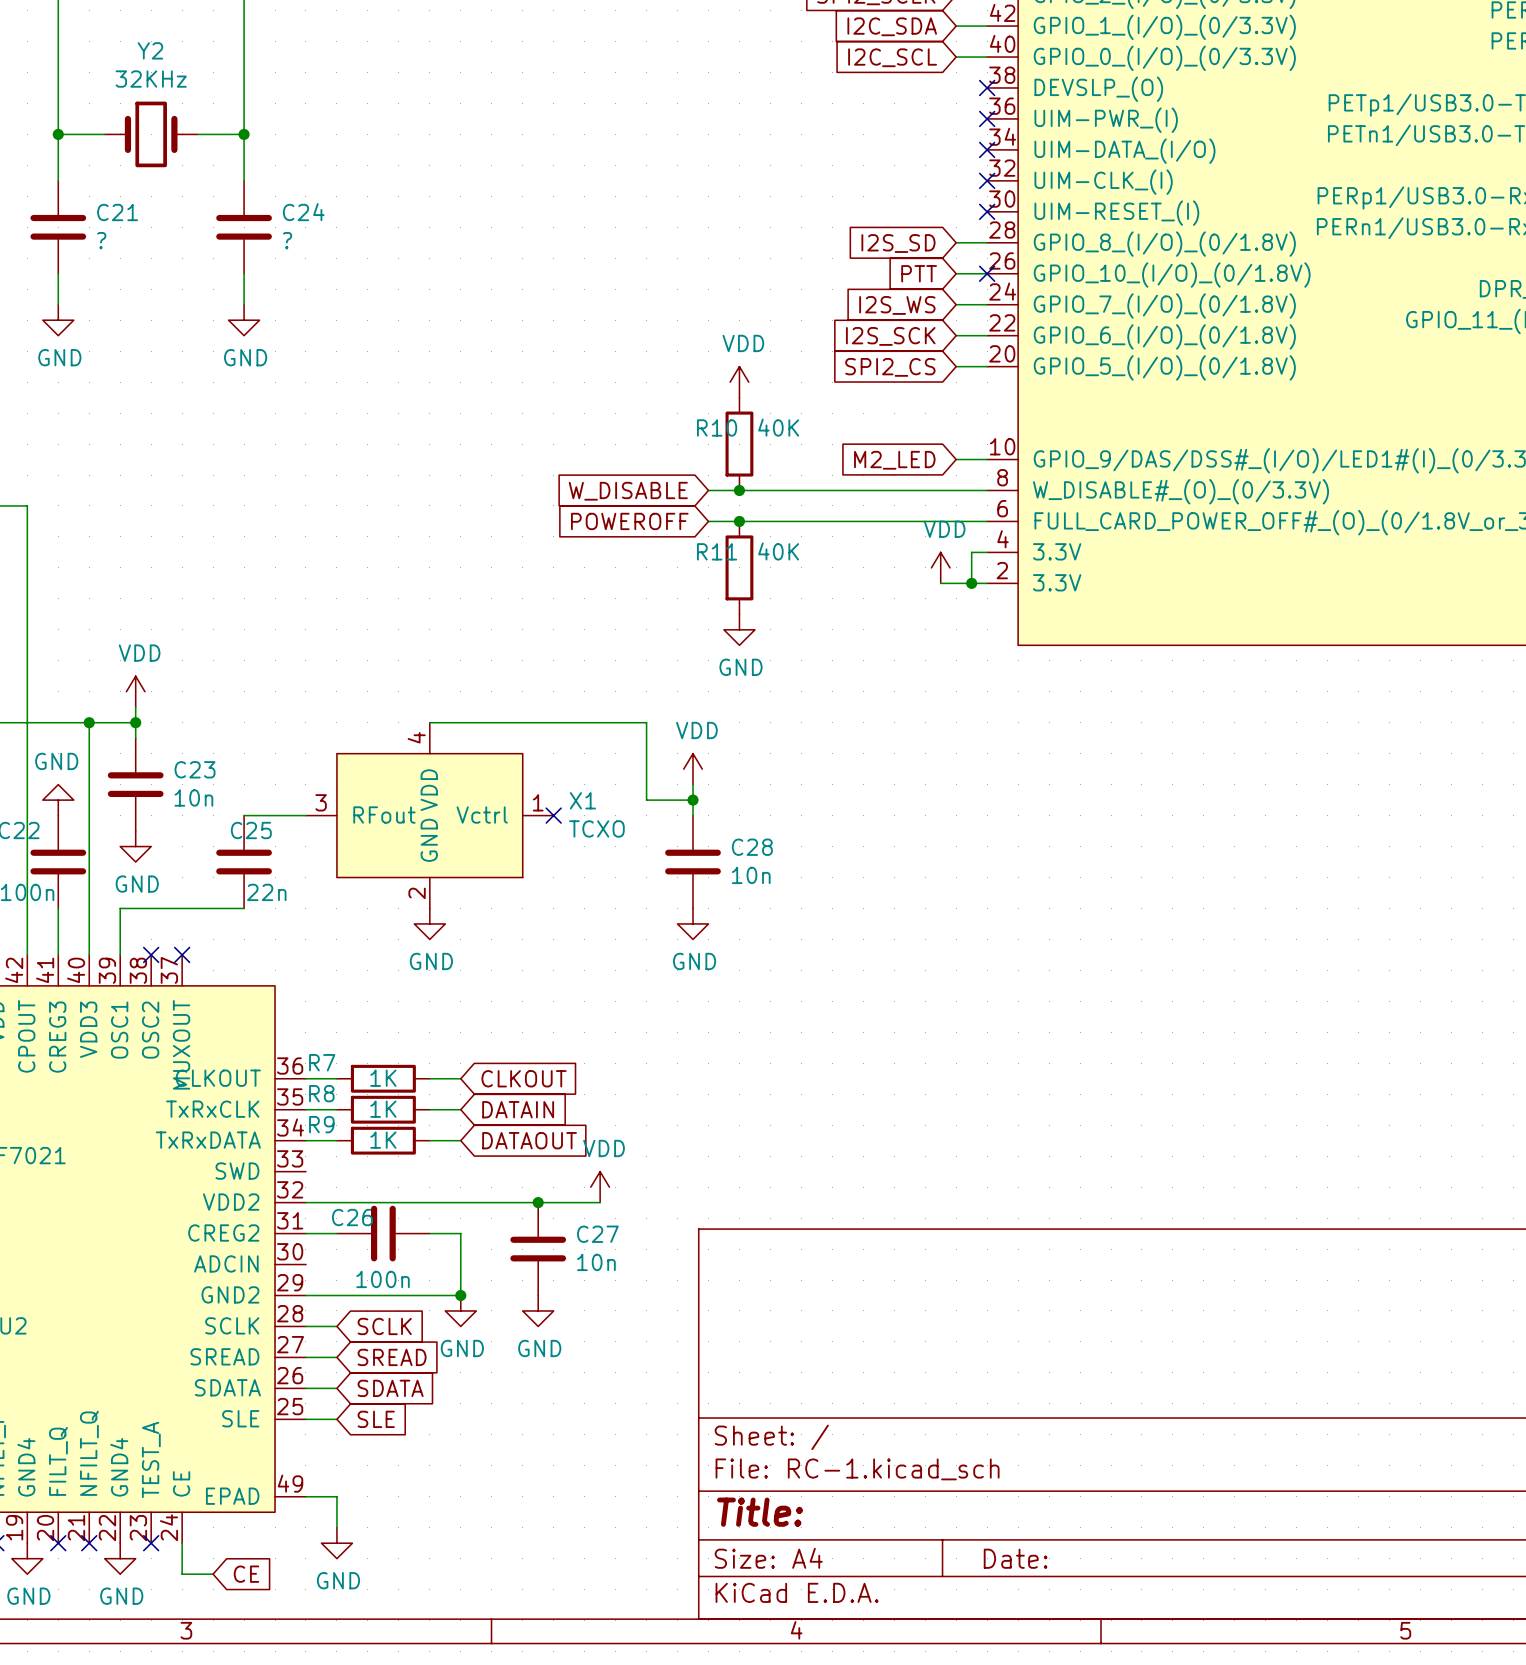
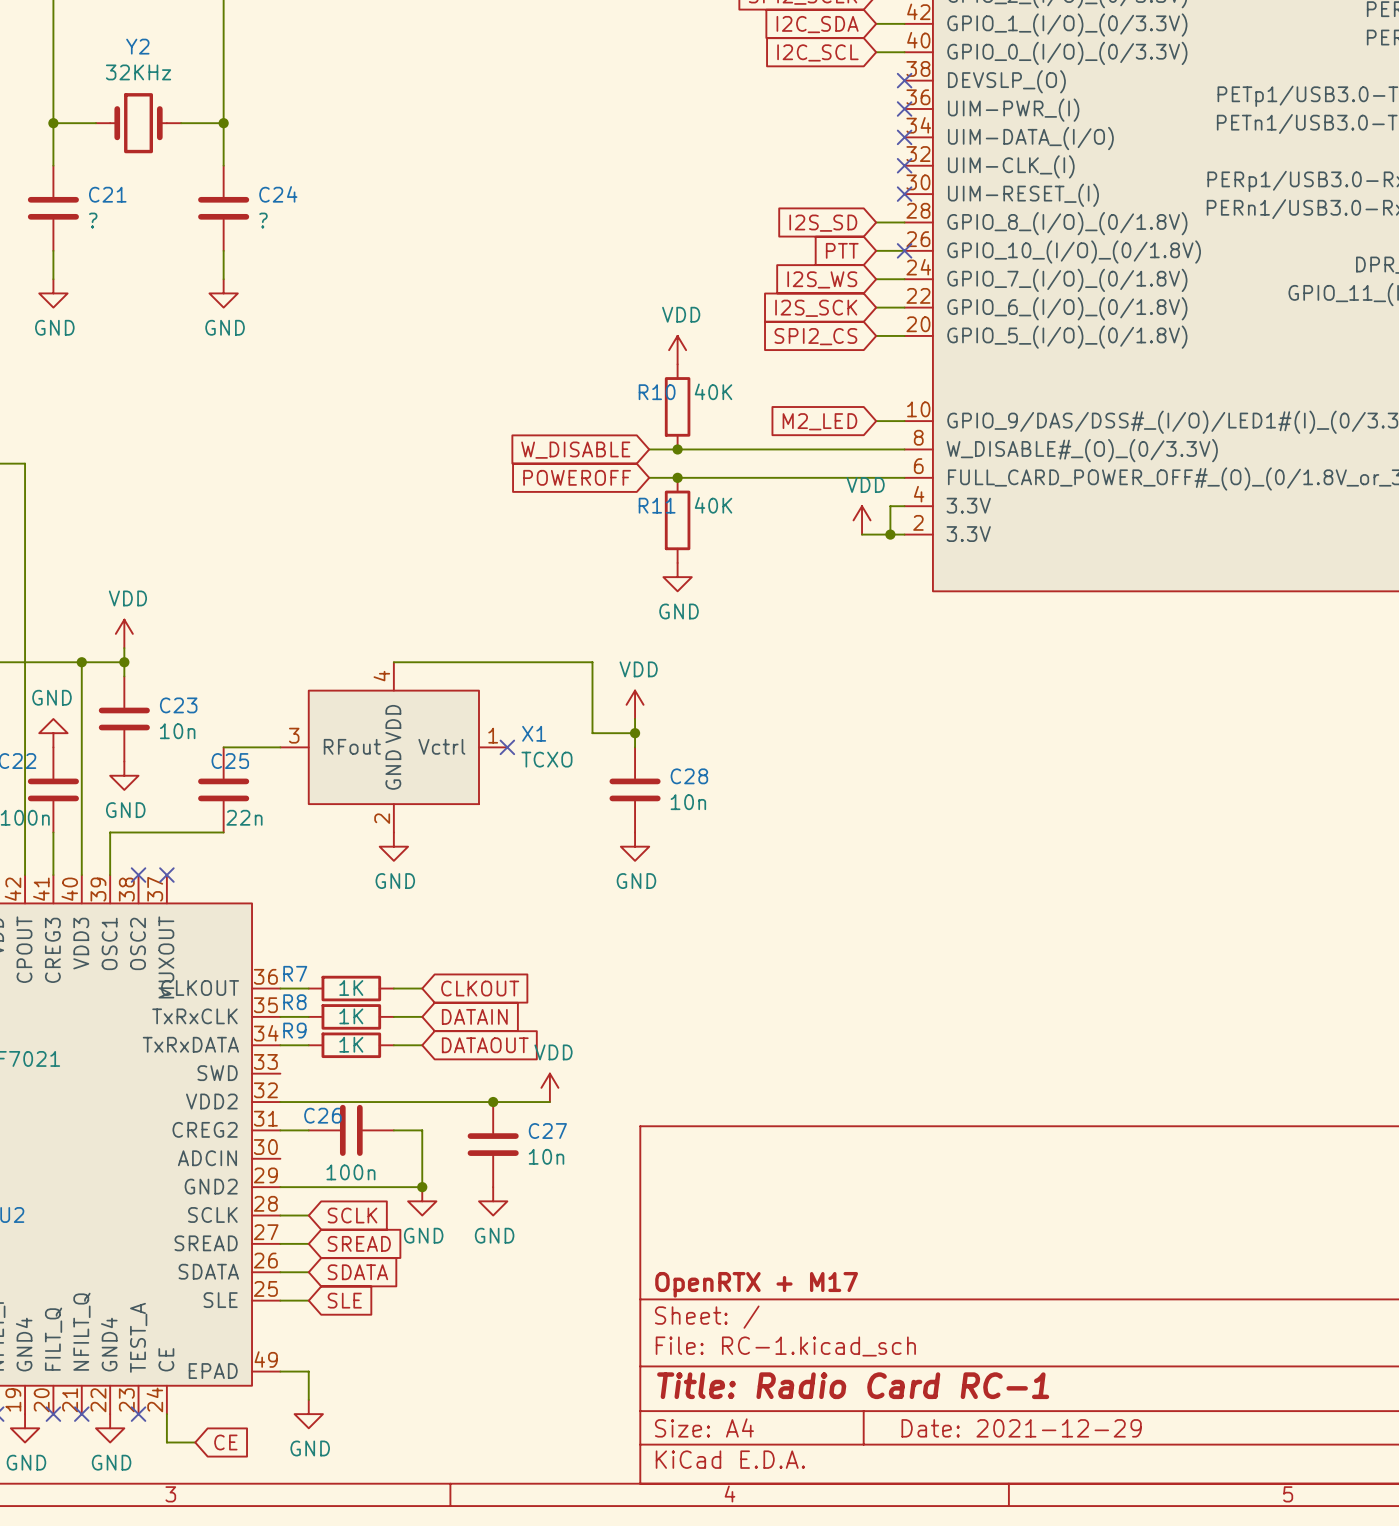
title block: none -> OpenRTX + M17 (756, 1284)
title block: Title: (760, 1512) -> Title: Radio Card RC-1 (853, 1385)
title block: Date: (1015, 1558) -> Date: 2021-12-29 (1021, 1428)

